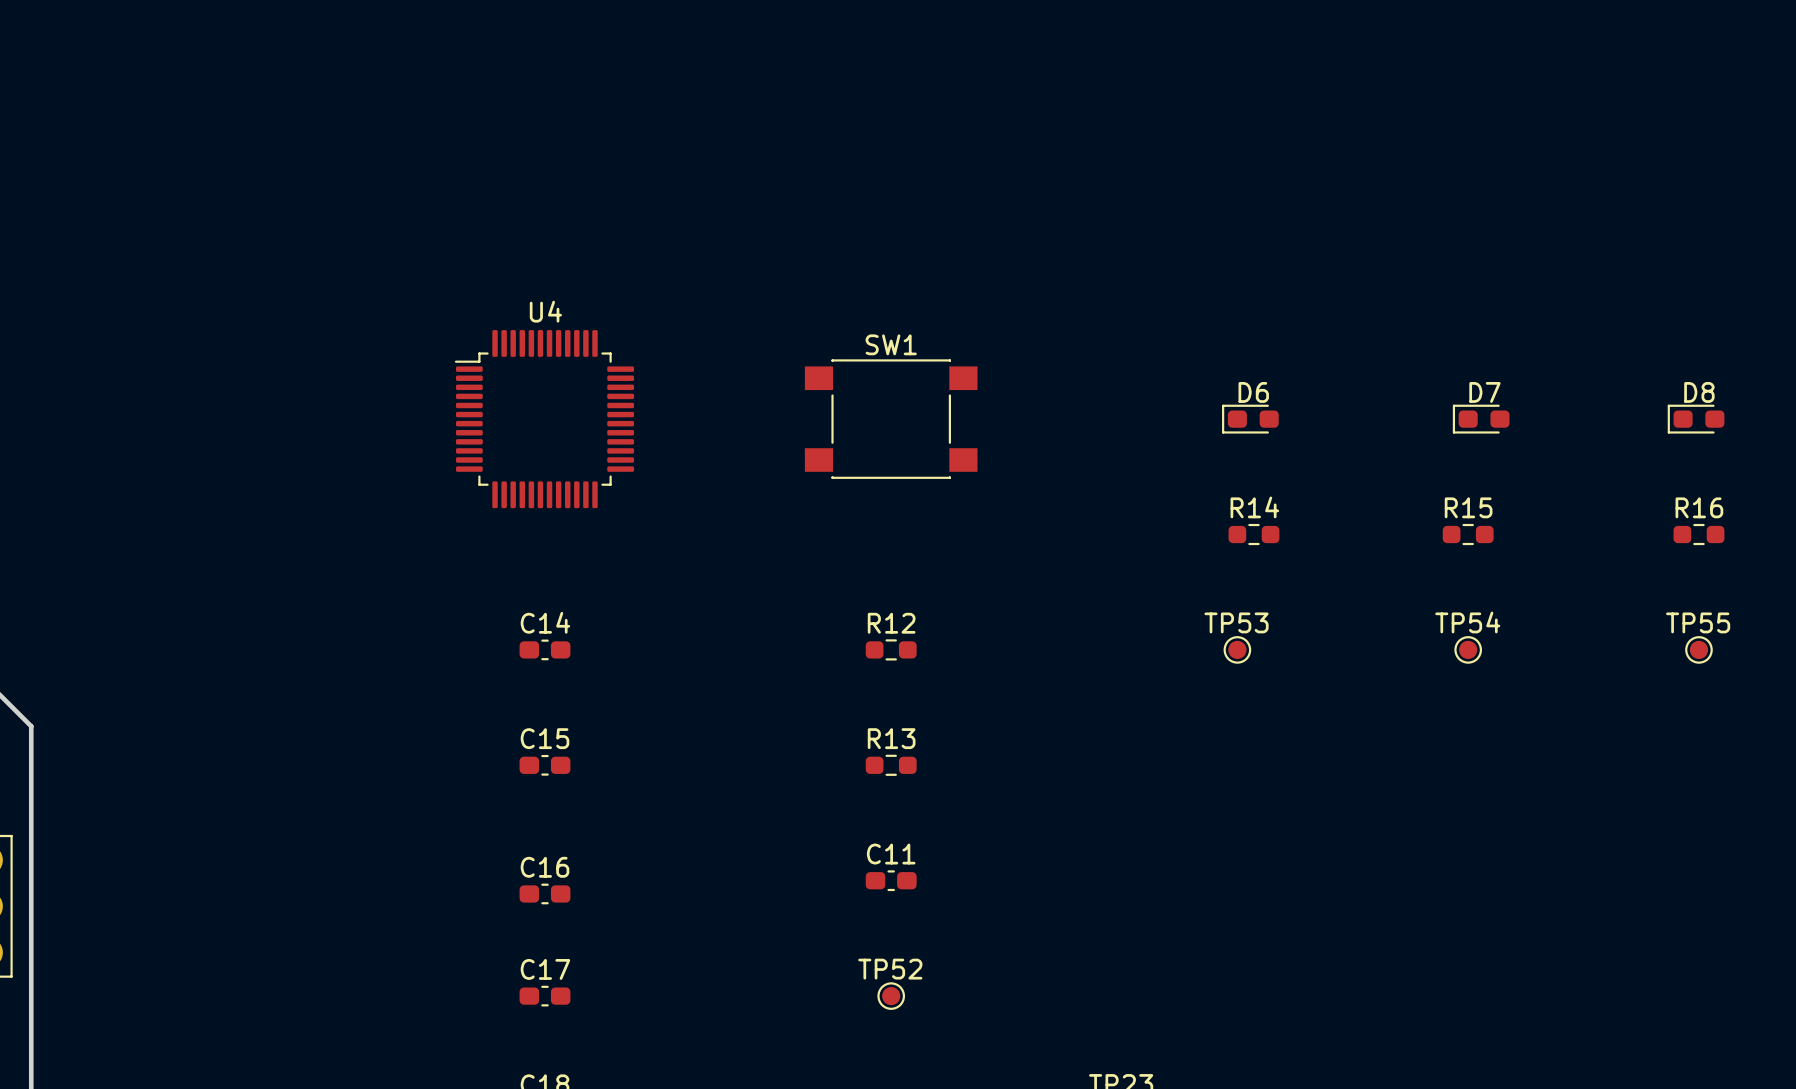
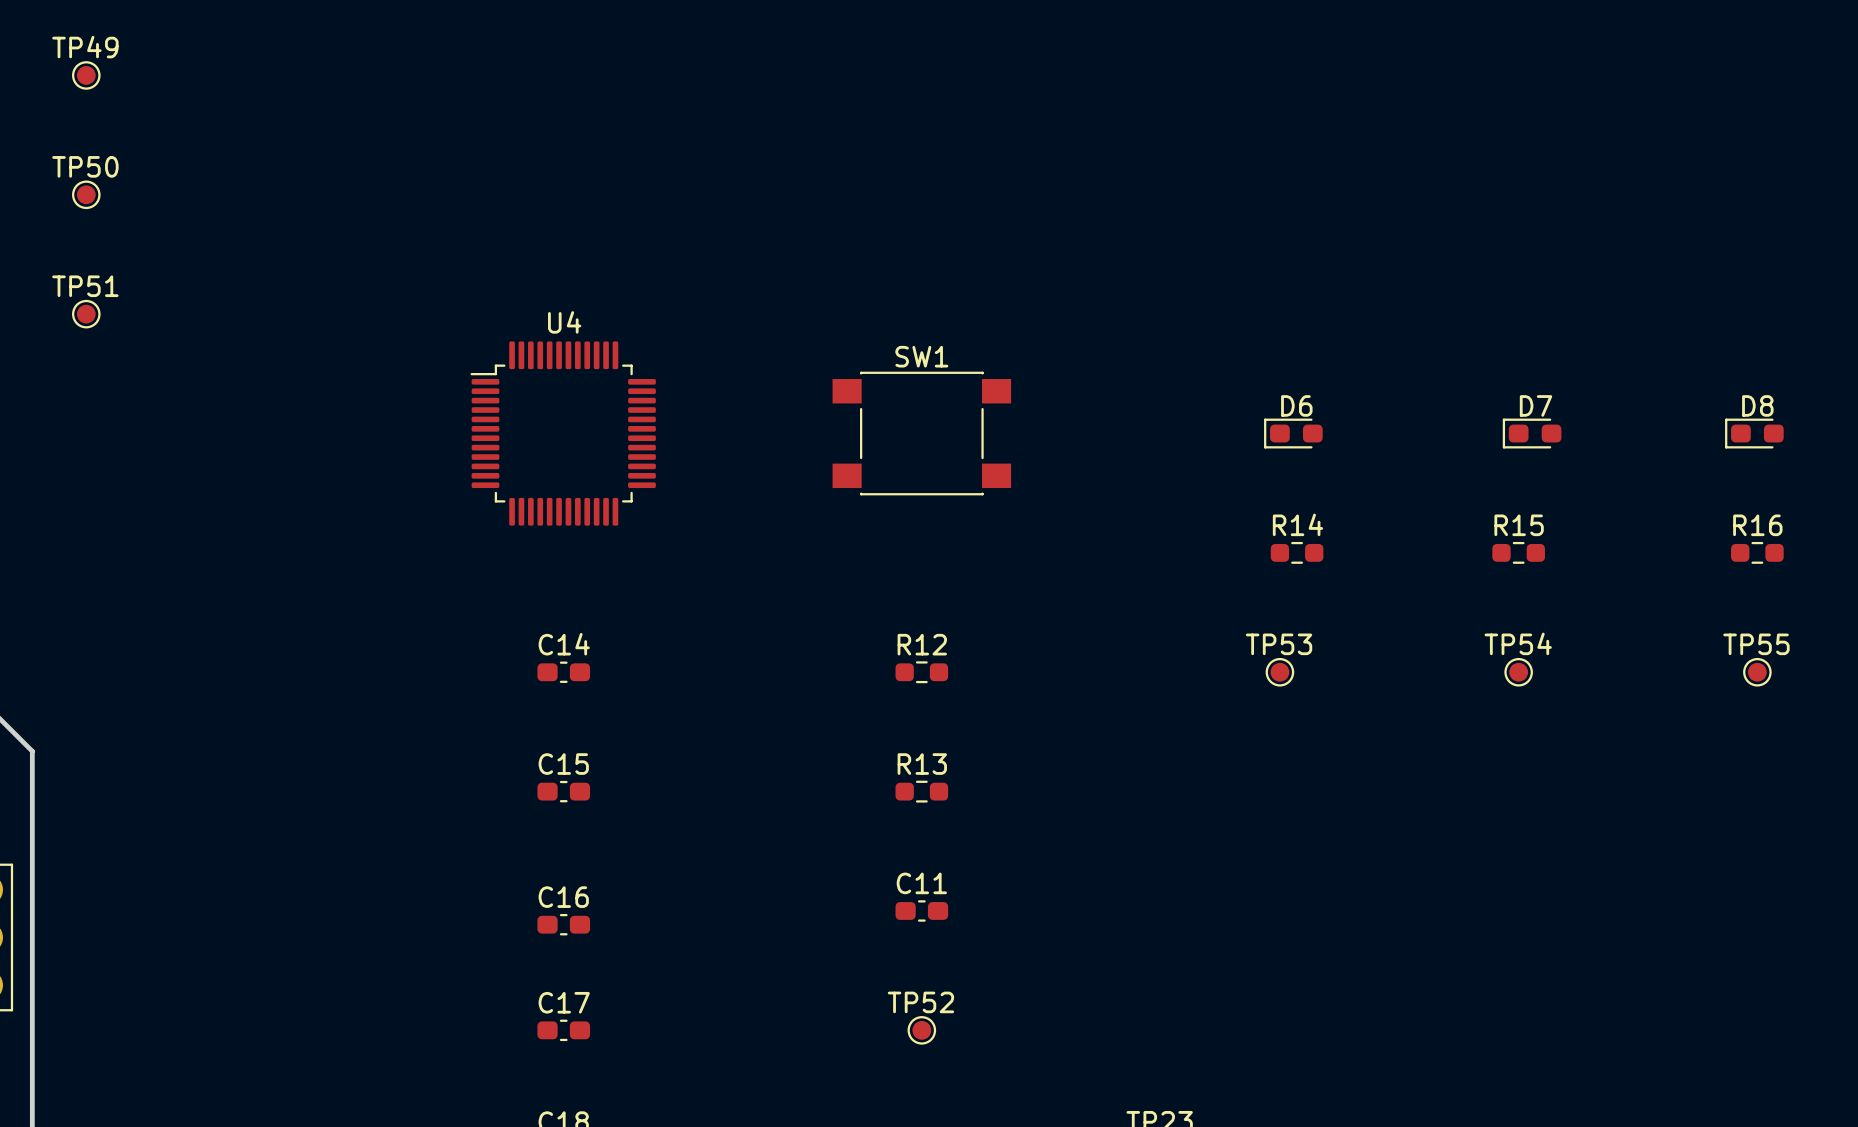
TP49: none -> (86, 75)
TP50: none -> (86, 194)
TP51: none -> (86, 314)

